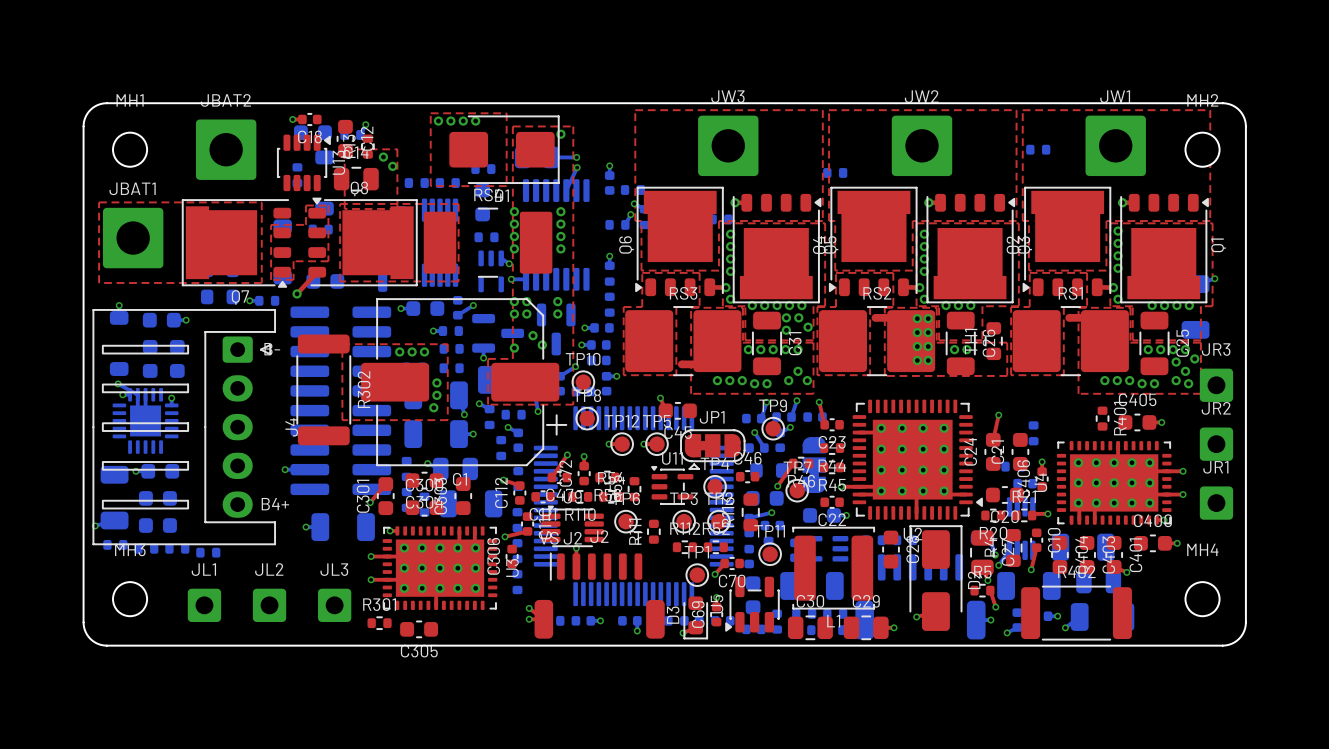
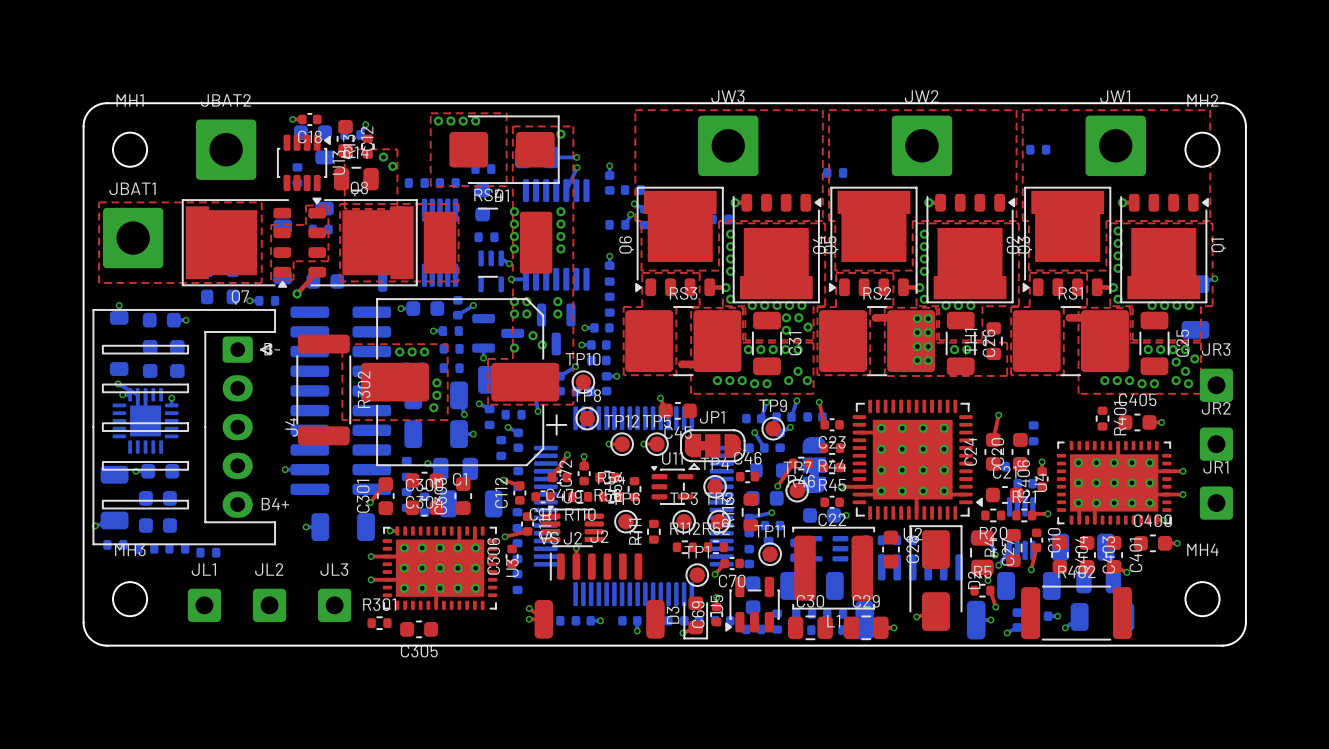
C21 name: C21 (997, 452) -> C20 (997, 451)
C20 name: C20 (1004, 516) -> C21 (1004, 472)

